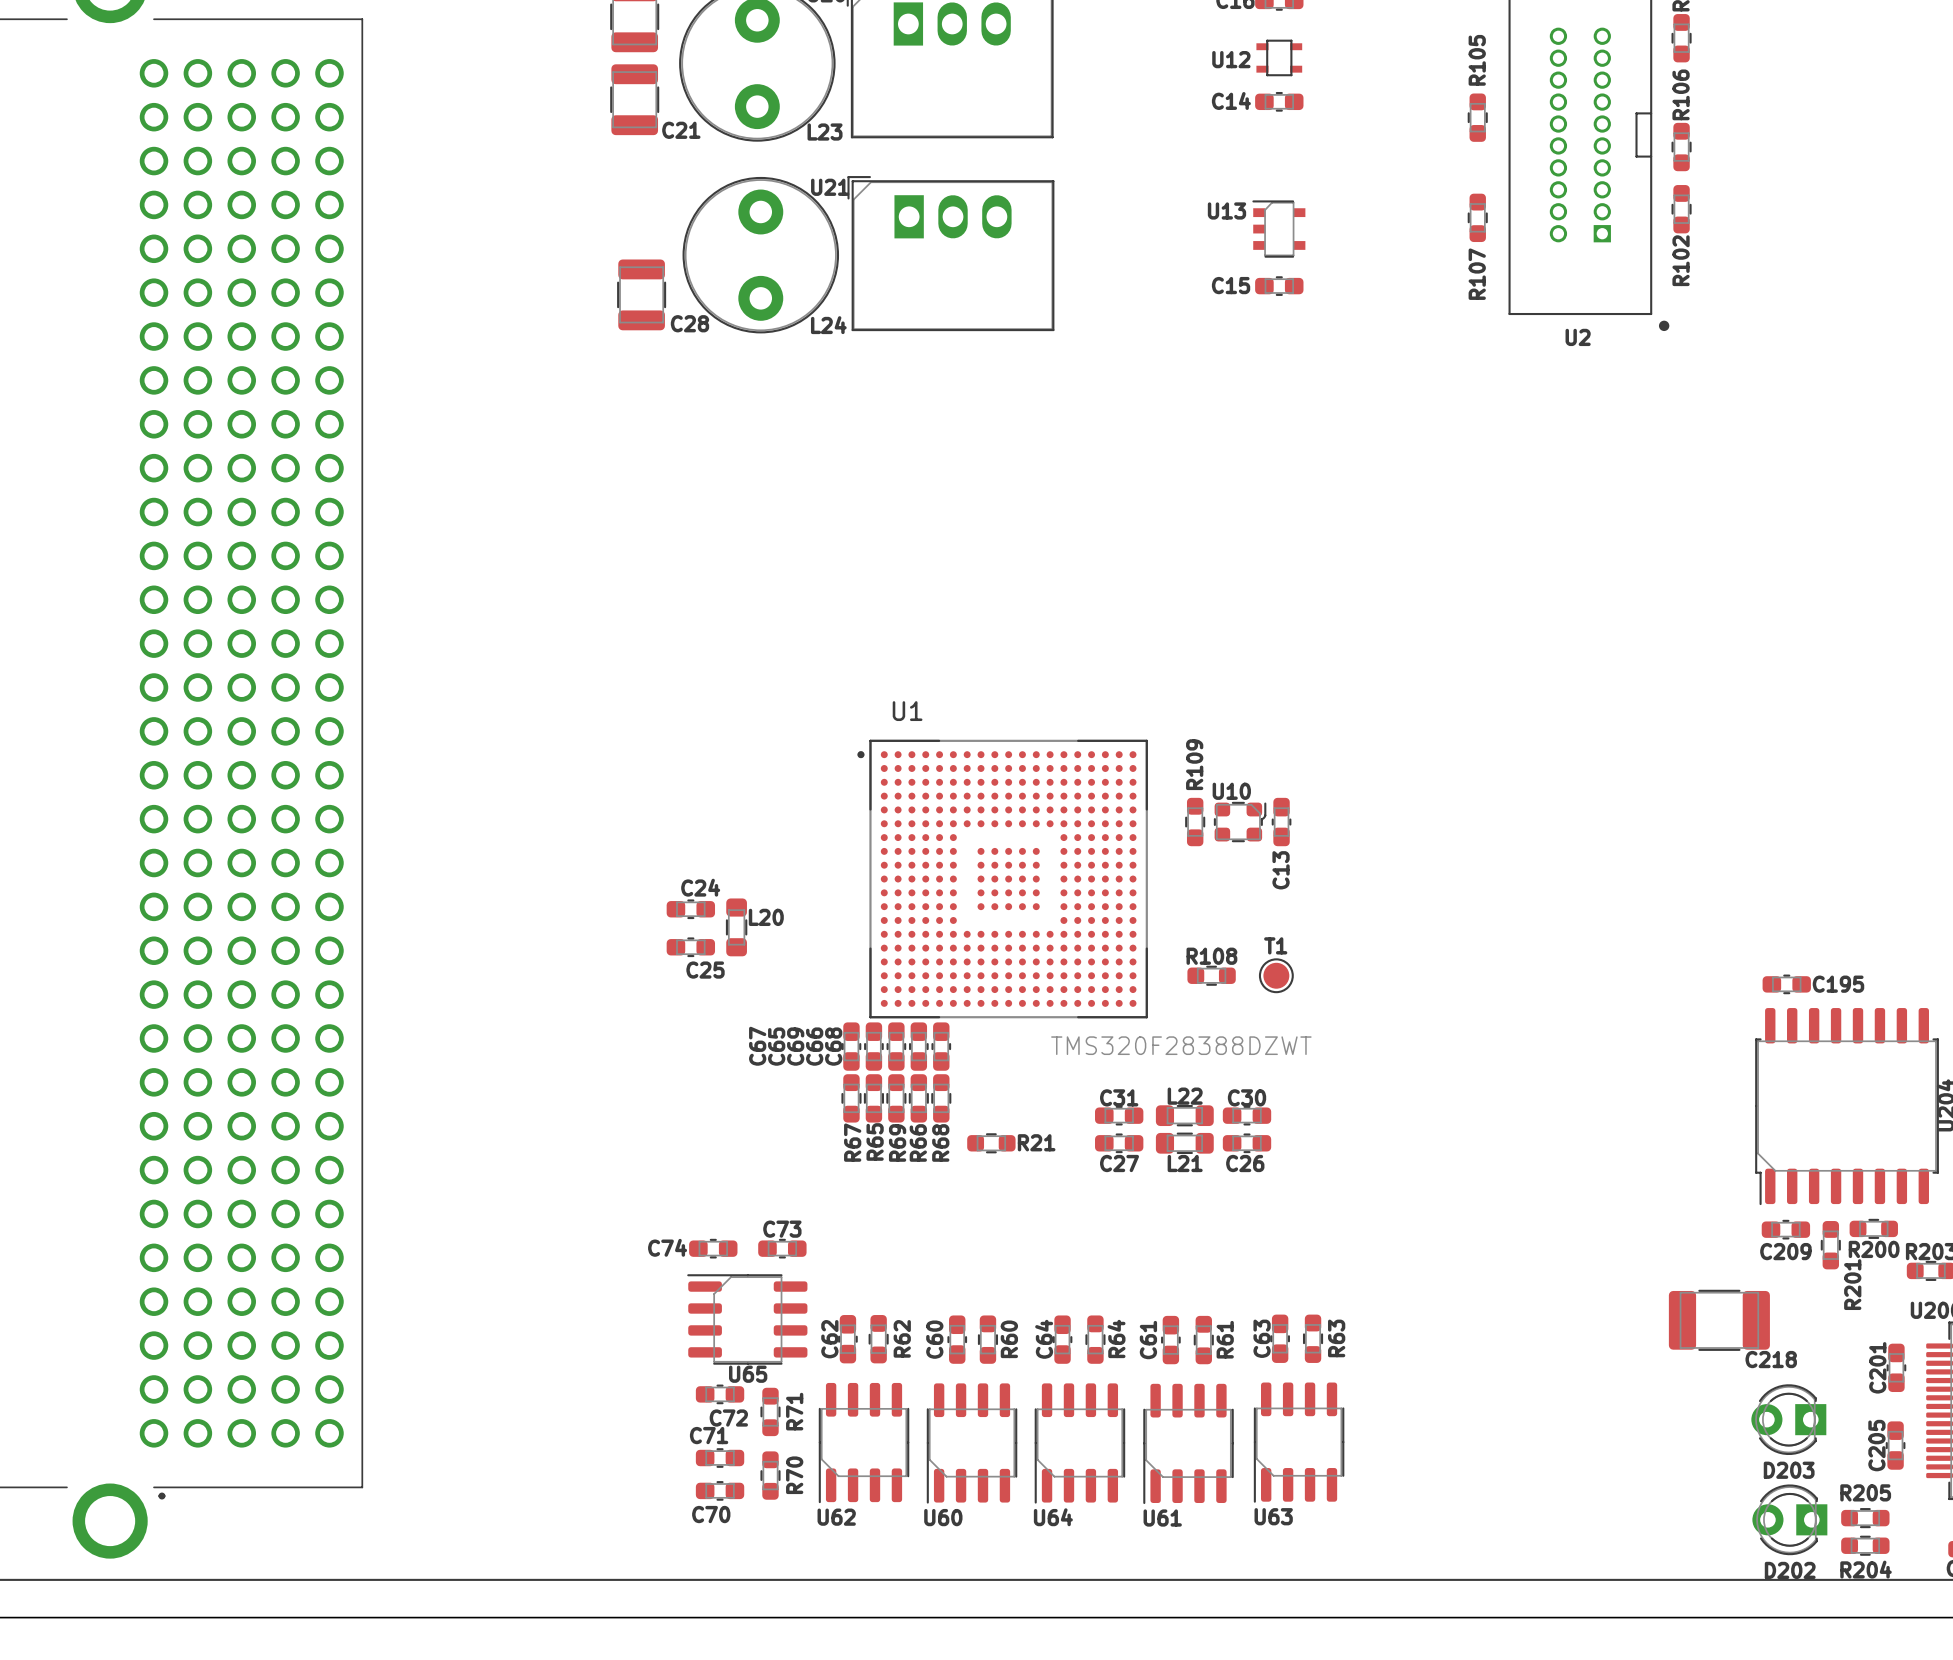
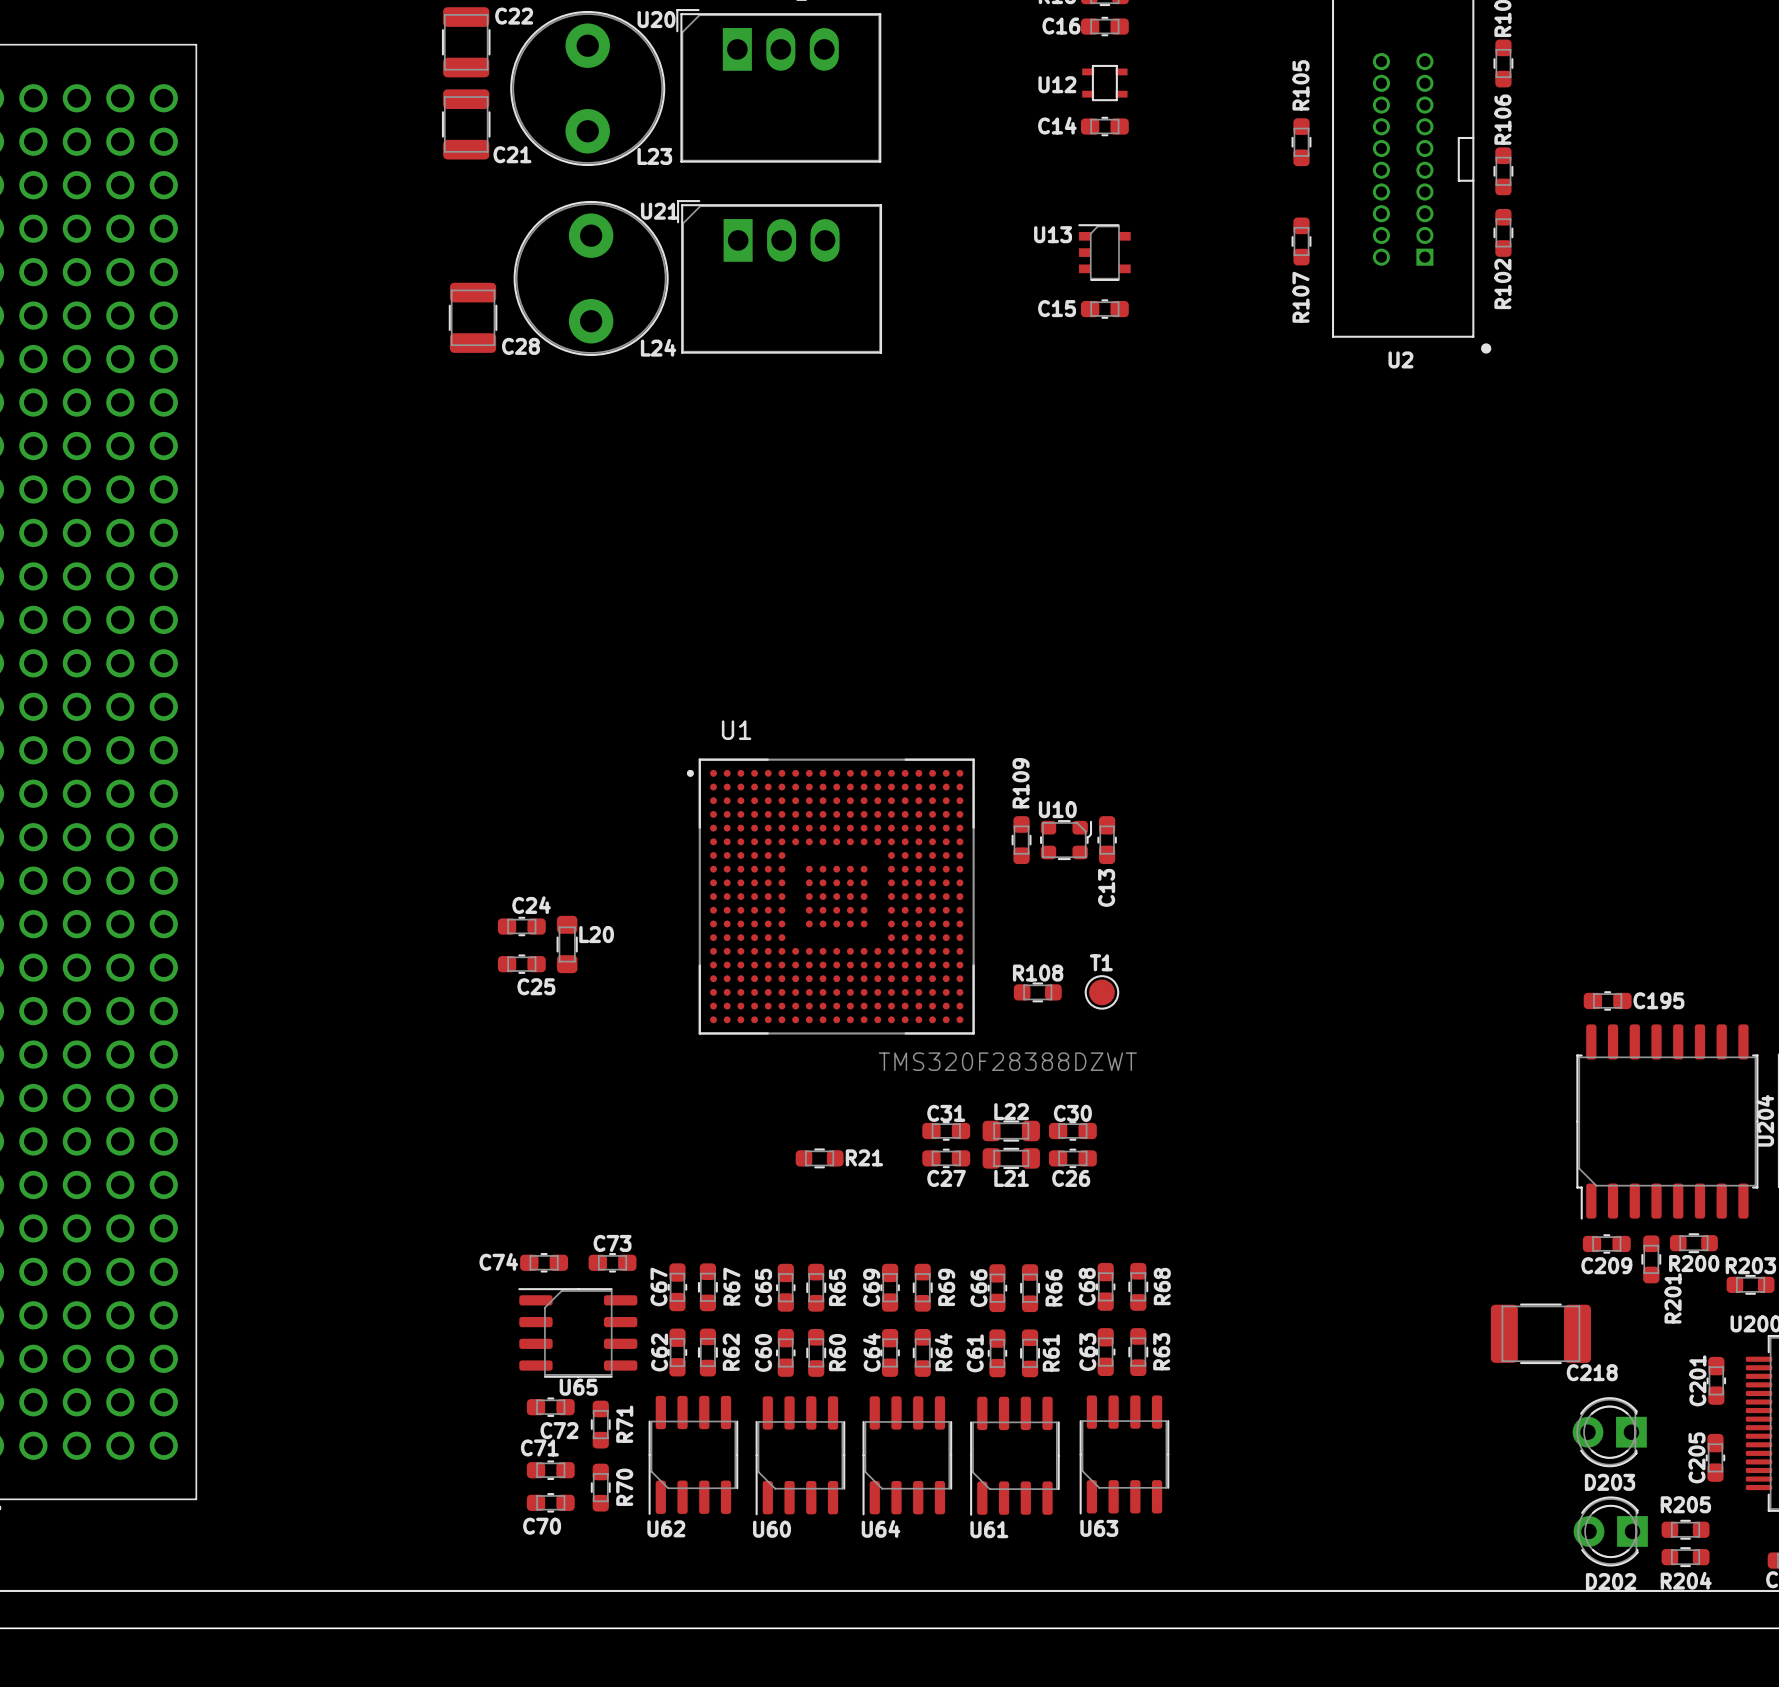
C67 name position: C67 (757, 1046) -> C67 (659, 1286)
C65 name position: C65 (776, 1046) -> C65 (763, 1287)
C69 name position: C69 (795, 1046) -> C69 (871, 1287)
C66 name position: C66 (814, 1046) -> C66 (978, 1288)
C68 name position: C68 (833, 1046) -> C68 (1087, 1286)
C67 position: (851, 1046) -> (677, 1287)
C65 position: (873, 1046) -> (785, 1287)
C69 position: (896, 1046) -> (890, 1287)
C66 position: (918, 1046) -> (997, 1288)
C68 position: (941, 1046) -> (1105, 1286)
R67 position: (851, 1098) -> (707, 1287)
R65 position: (873, 1098) -> (816, 1287)
R69 position: (896, 1098) -> (922, 1287)
R66 position: (918, 1098) -> (1030, 1288)
R68 position: (941, 1098) -> (1138, 1286)
R65 name position: R65 (875, 1141) -> R65 (837, 1287)
R67 name position: R67 (852, 1142) -> R67 (731, 1286)
R69 name position: R69 (897, 1142) -> R69 (946, 1287)
R66 name position: R66 (918, 1142) -> R66 (1054, 1287)
R68 name position: R68 (940, 1142) -> R68 (1162, 1286)

